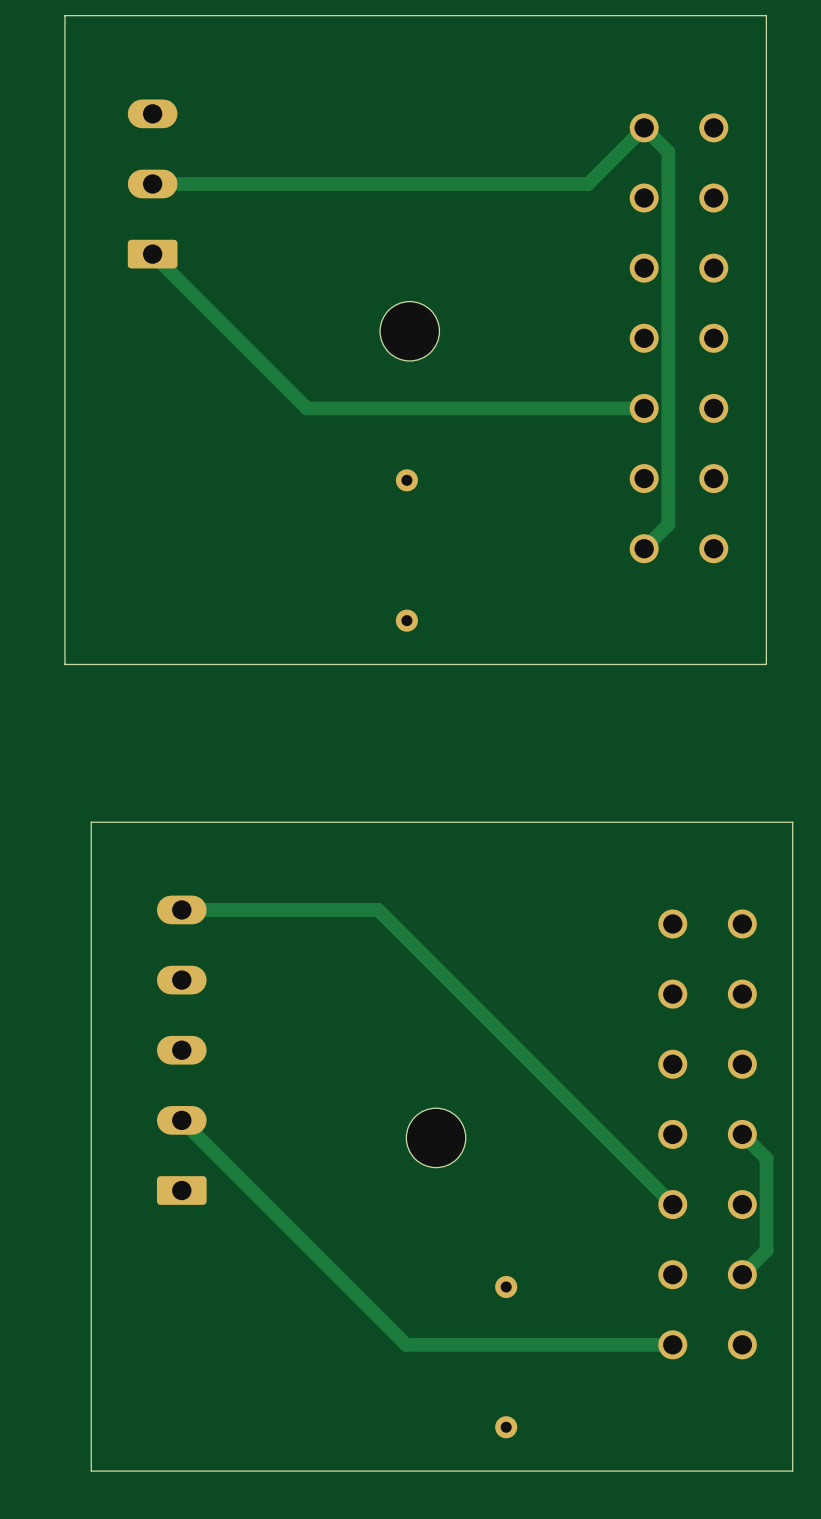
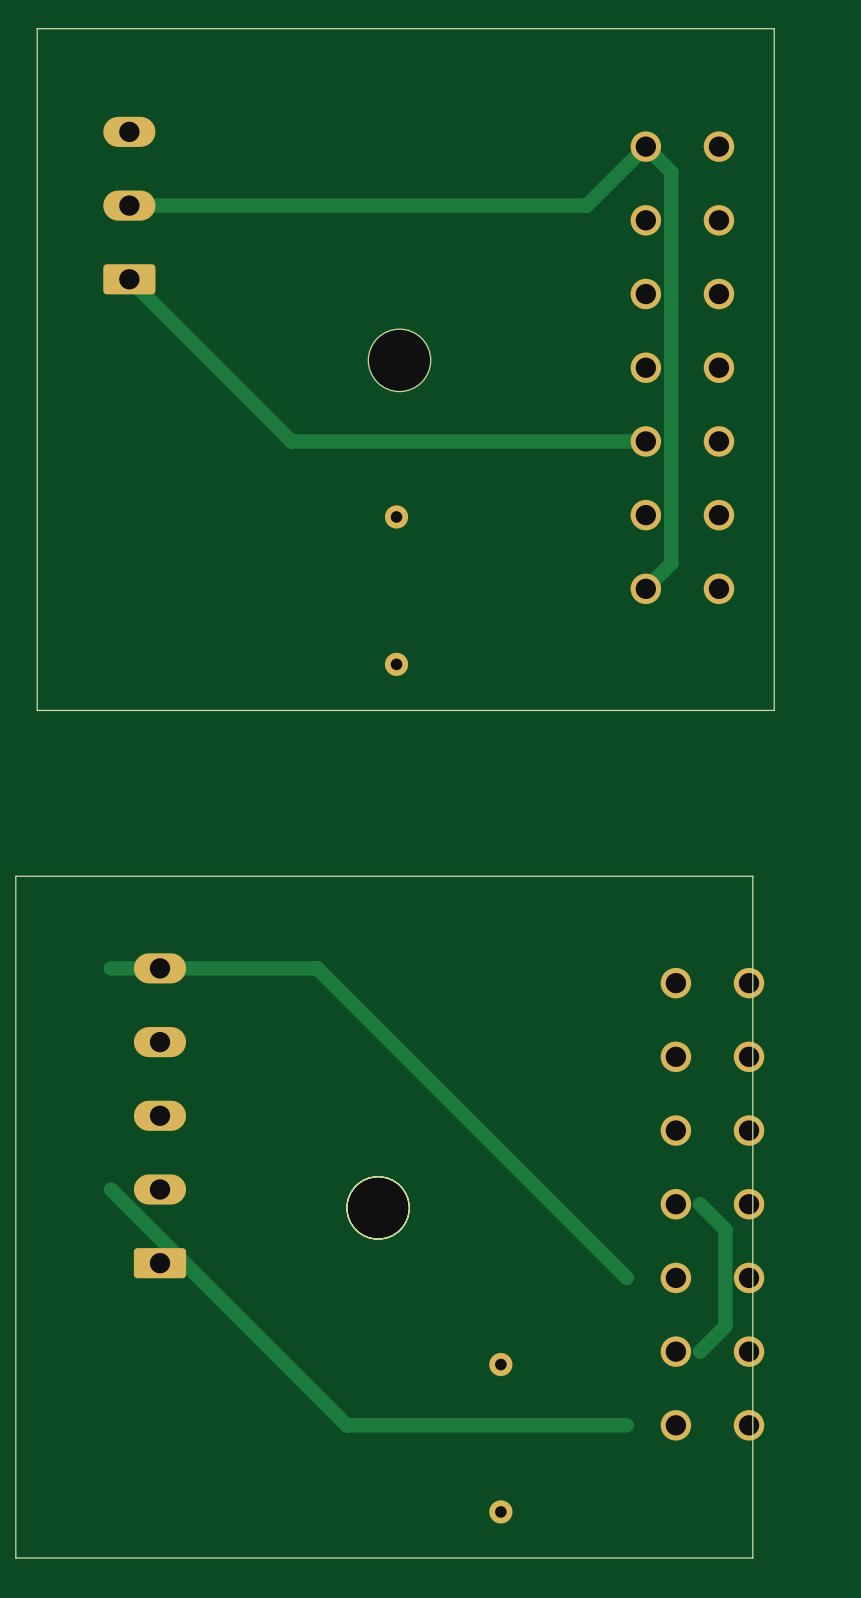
board edge: (91, 822) (91, 1471) -> (64, 876) (15, 876) (15, 1557) (64, 1557)
board edge: (745, 822) (792, 822) (792, 1471) (745, 1471) -> (752, 876) (752, 1557)
track: none -> (159, 968) (110, 968)
track: (331, 909) (378, 909) (672, 1204) -> (317, 968) (626, 1277)
track: (181, 1120) (406, 1344) -> (110, 1189) (346, 1425) (395, 1425)
track: (742, 1134) (766, 1158) (766, 1250) (742, 1274) -> (699, 1204) (725, 1229) (725, 1326) (699, 1351)
part position: (436, 1137) -> (378, 1207)
track: (672, 1344) (626, 1344) -> none

